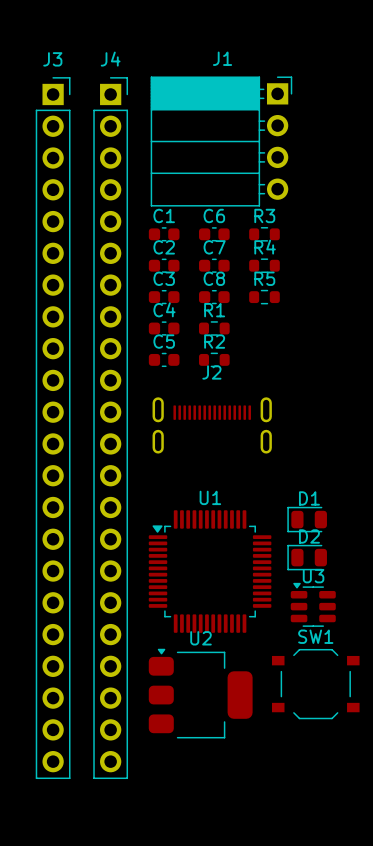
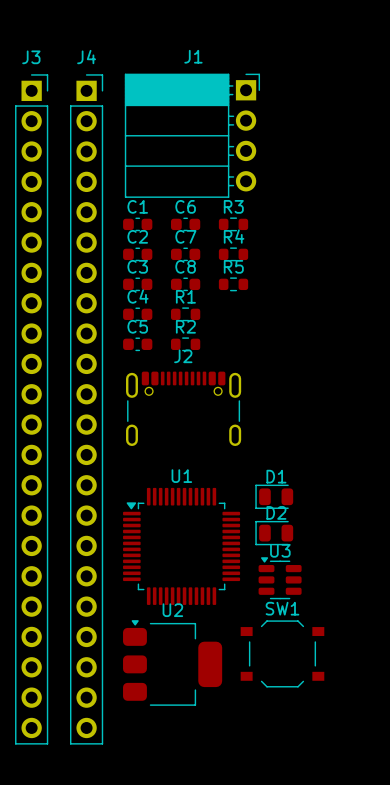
J2 footprint: [152, 397, 272, 454] -> [126, 371, 242, 447]

